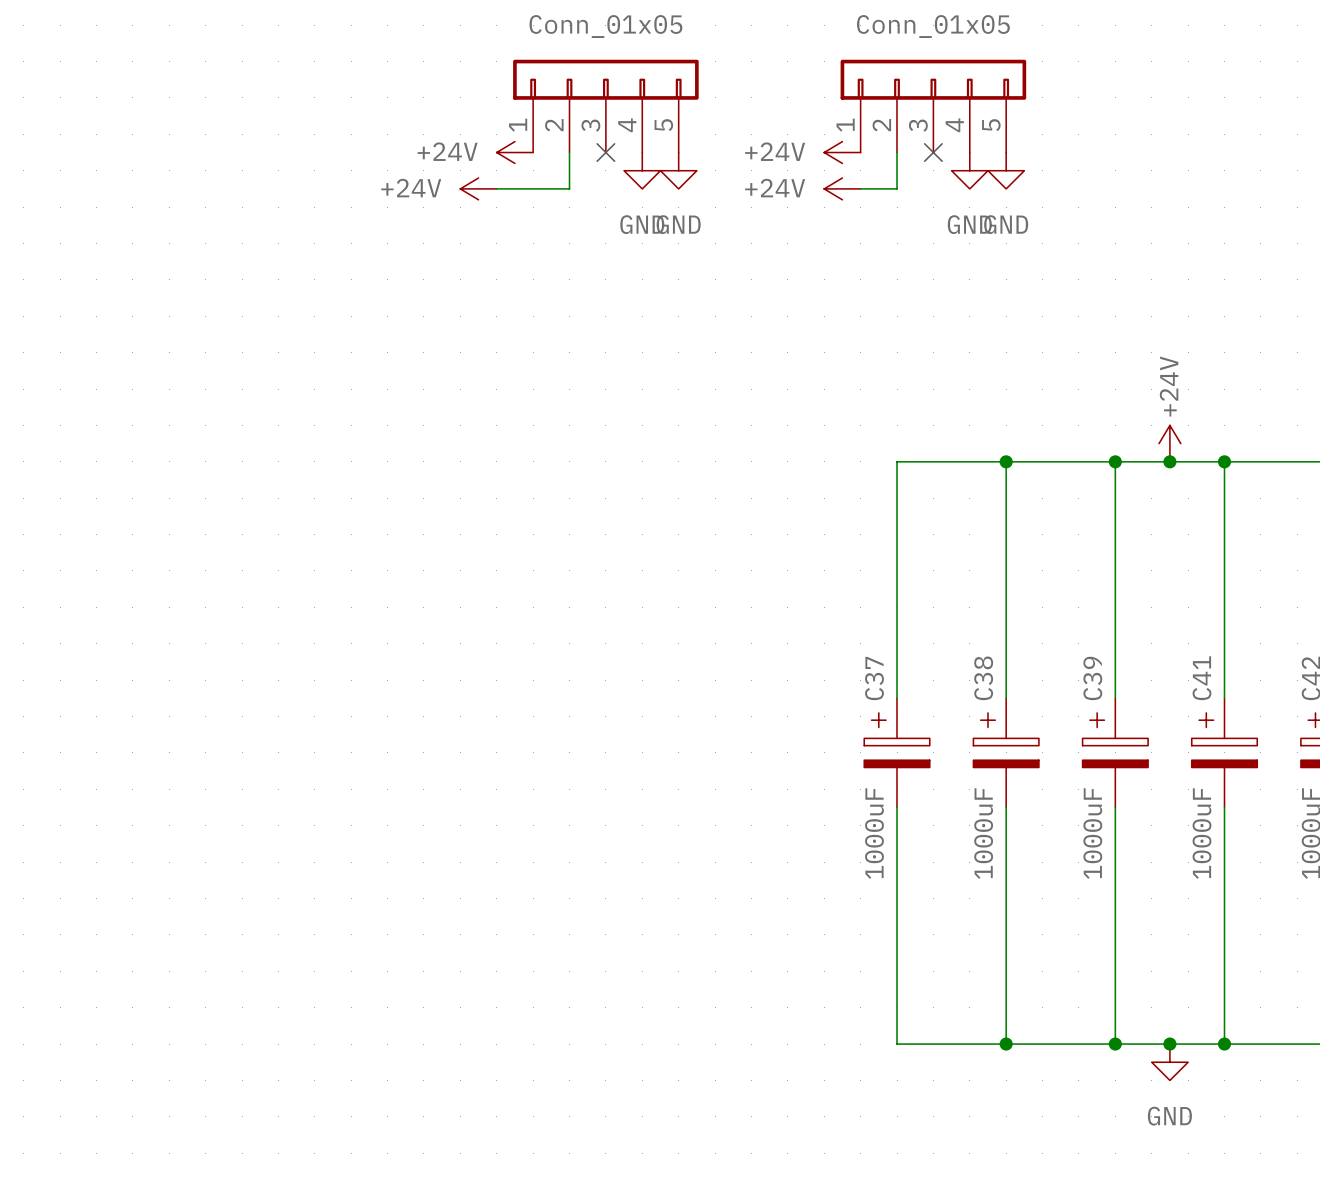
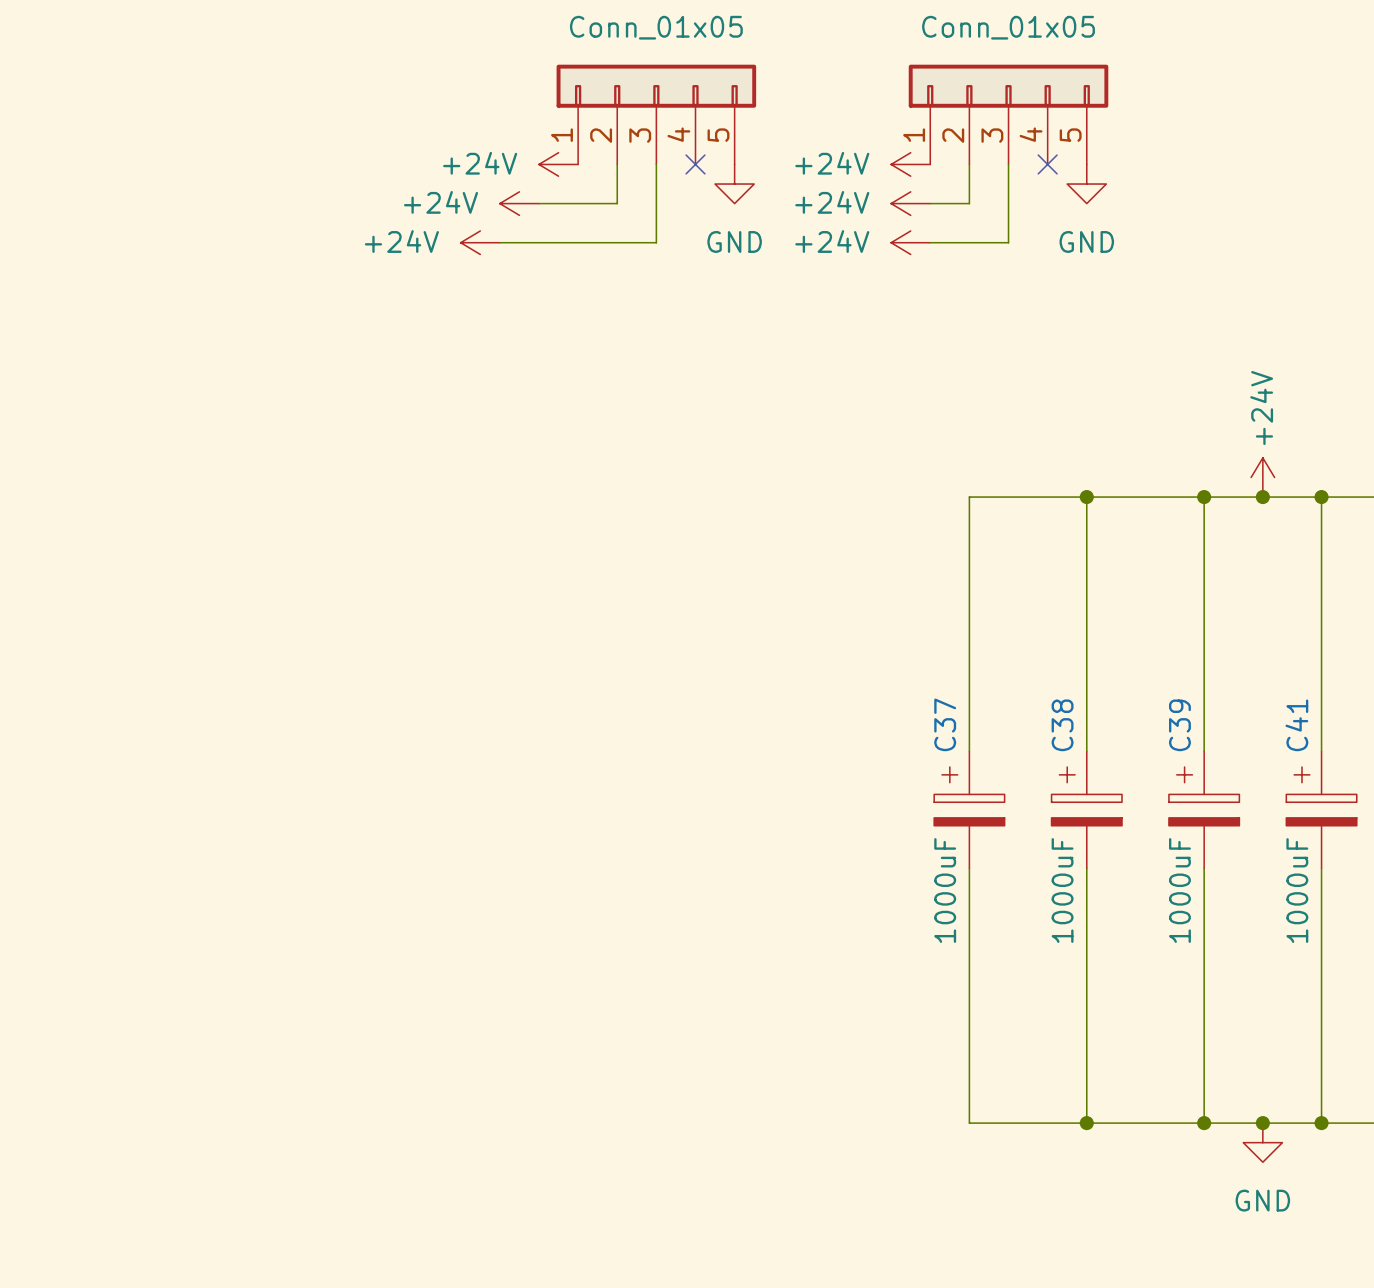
wire: none -> (656, 164) (656, 242) (499, 242)
no-connect mark position: (605, 152) -> (695, 164)
wire: none -> (1008, 164) (1008, 242) (930, 242)
no-connect mark position: (933, 152) -> (1047, 164)
power symbol: GND (642, 170) -> none
power symbol: GND (969, 170) -> none
power symbol: none -> +24V (480, 242)
power symbol: none -> +24V (910, 242)

